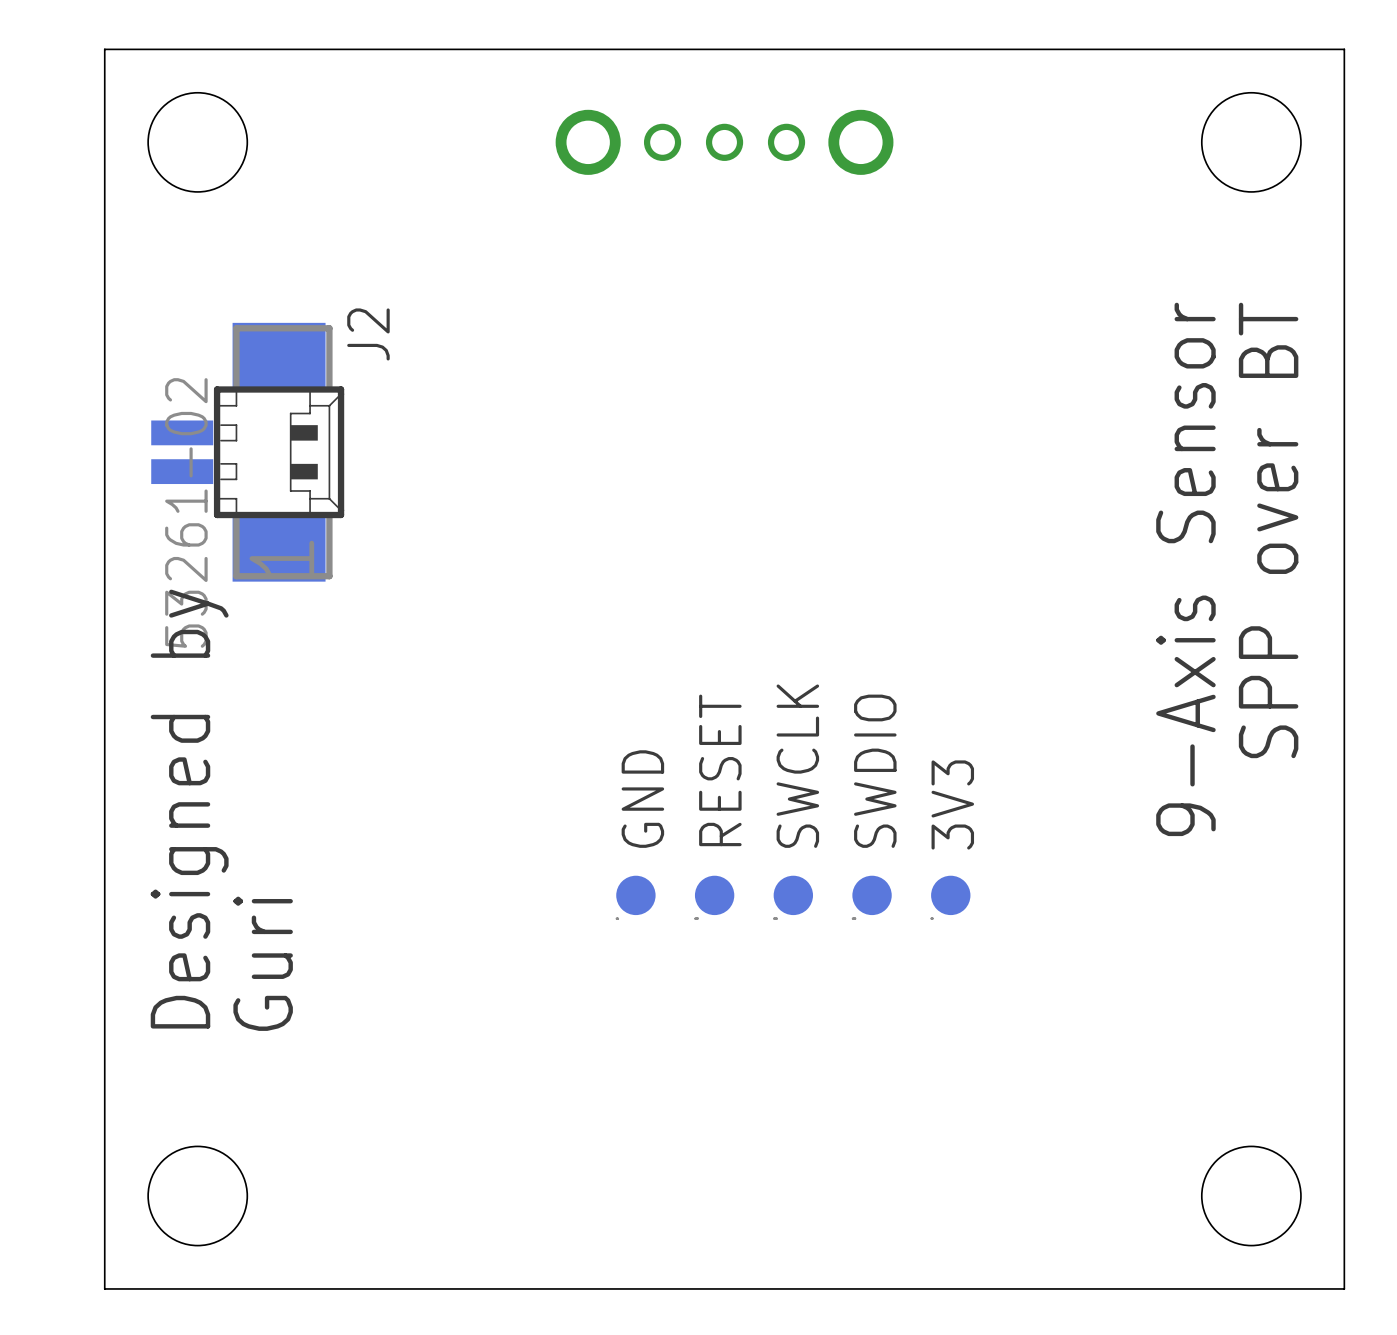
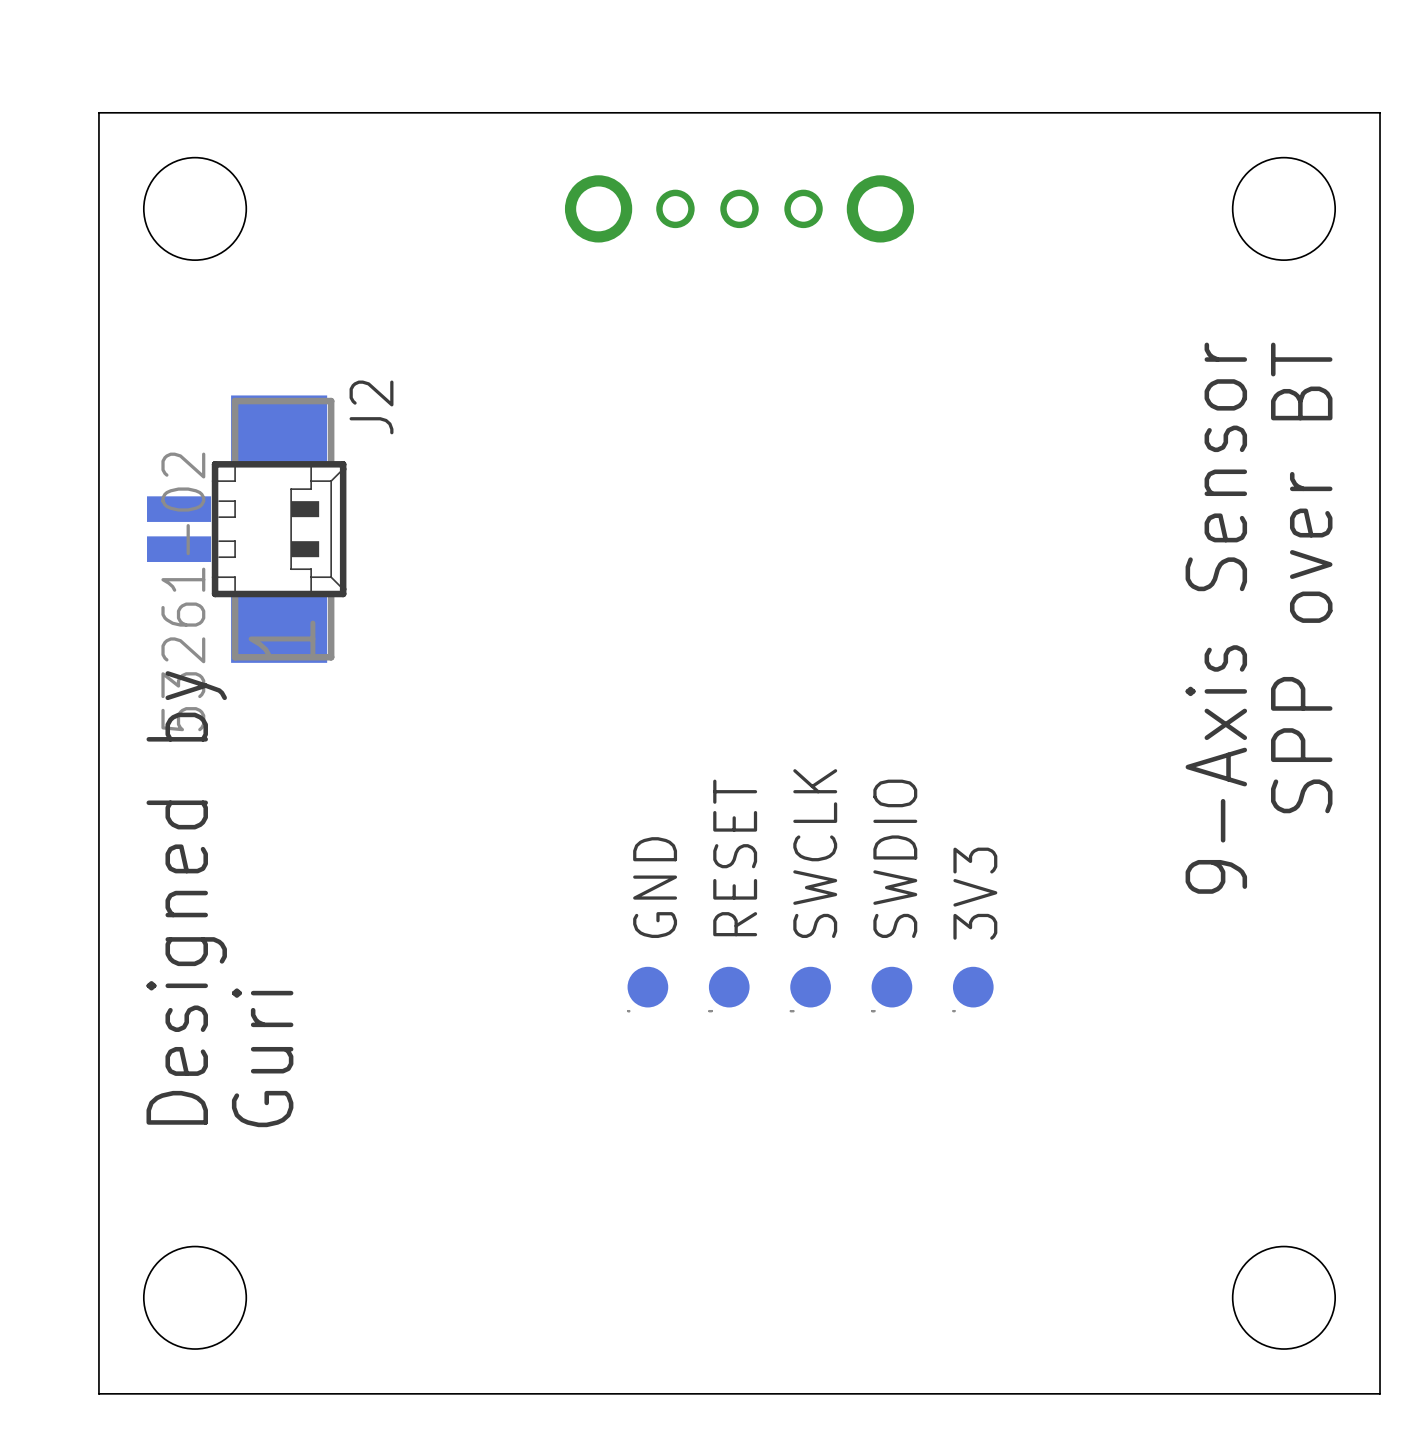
text position: SPP over BT (1268, 530) -> SPP over BT (1301, 577)
text position: 9-Axis Sensor (1185, 569) -> 9-Axis Sensor (1216, 618)

